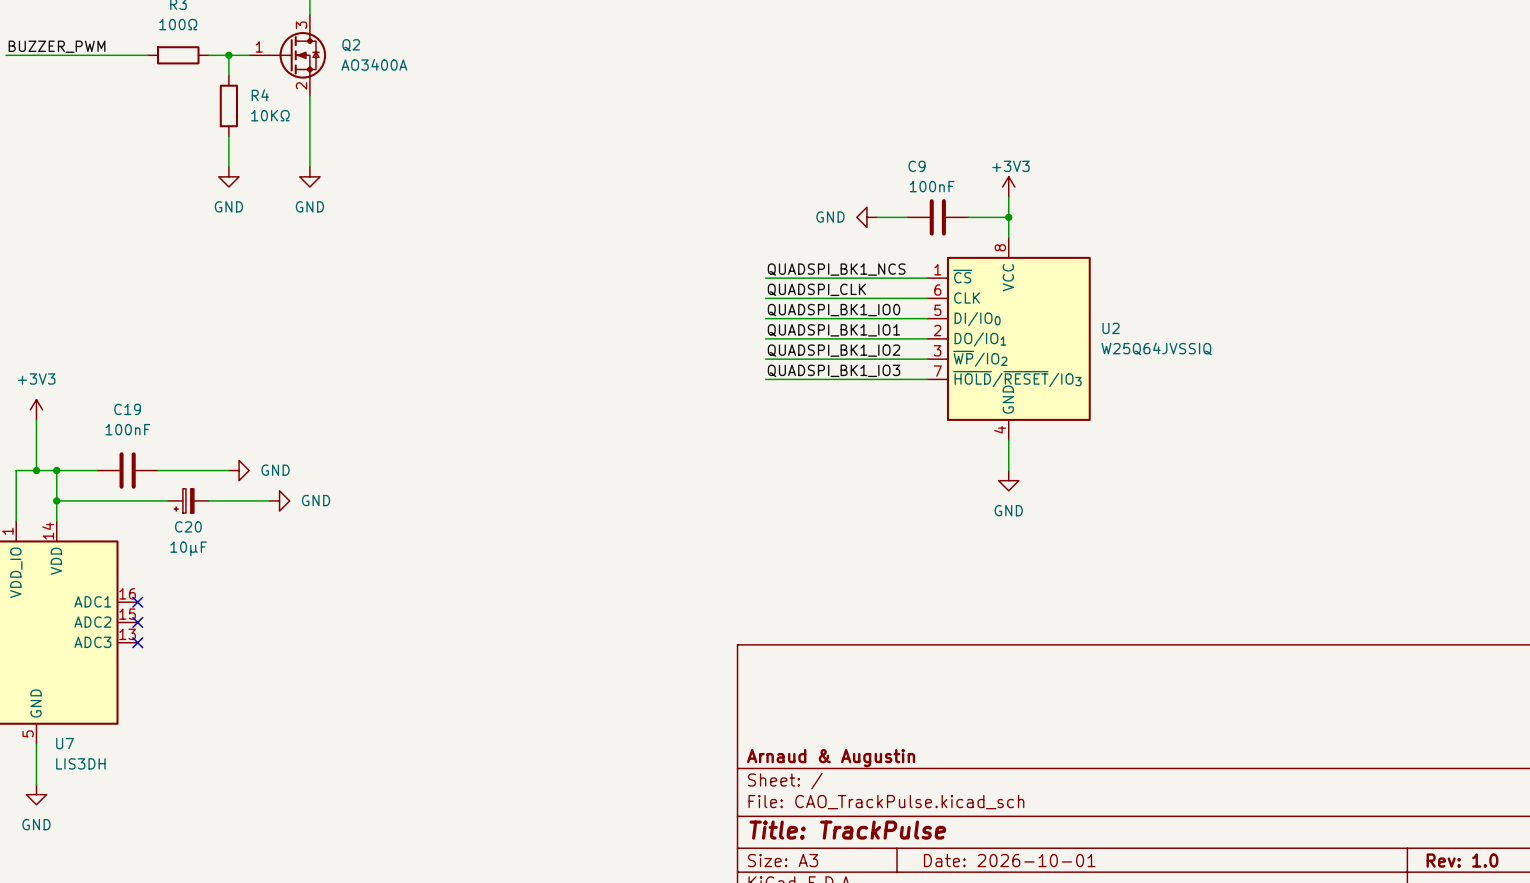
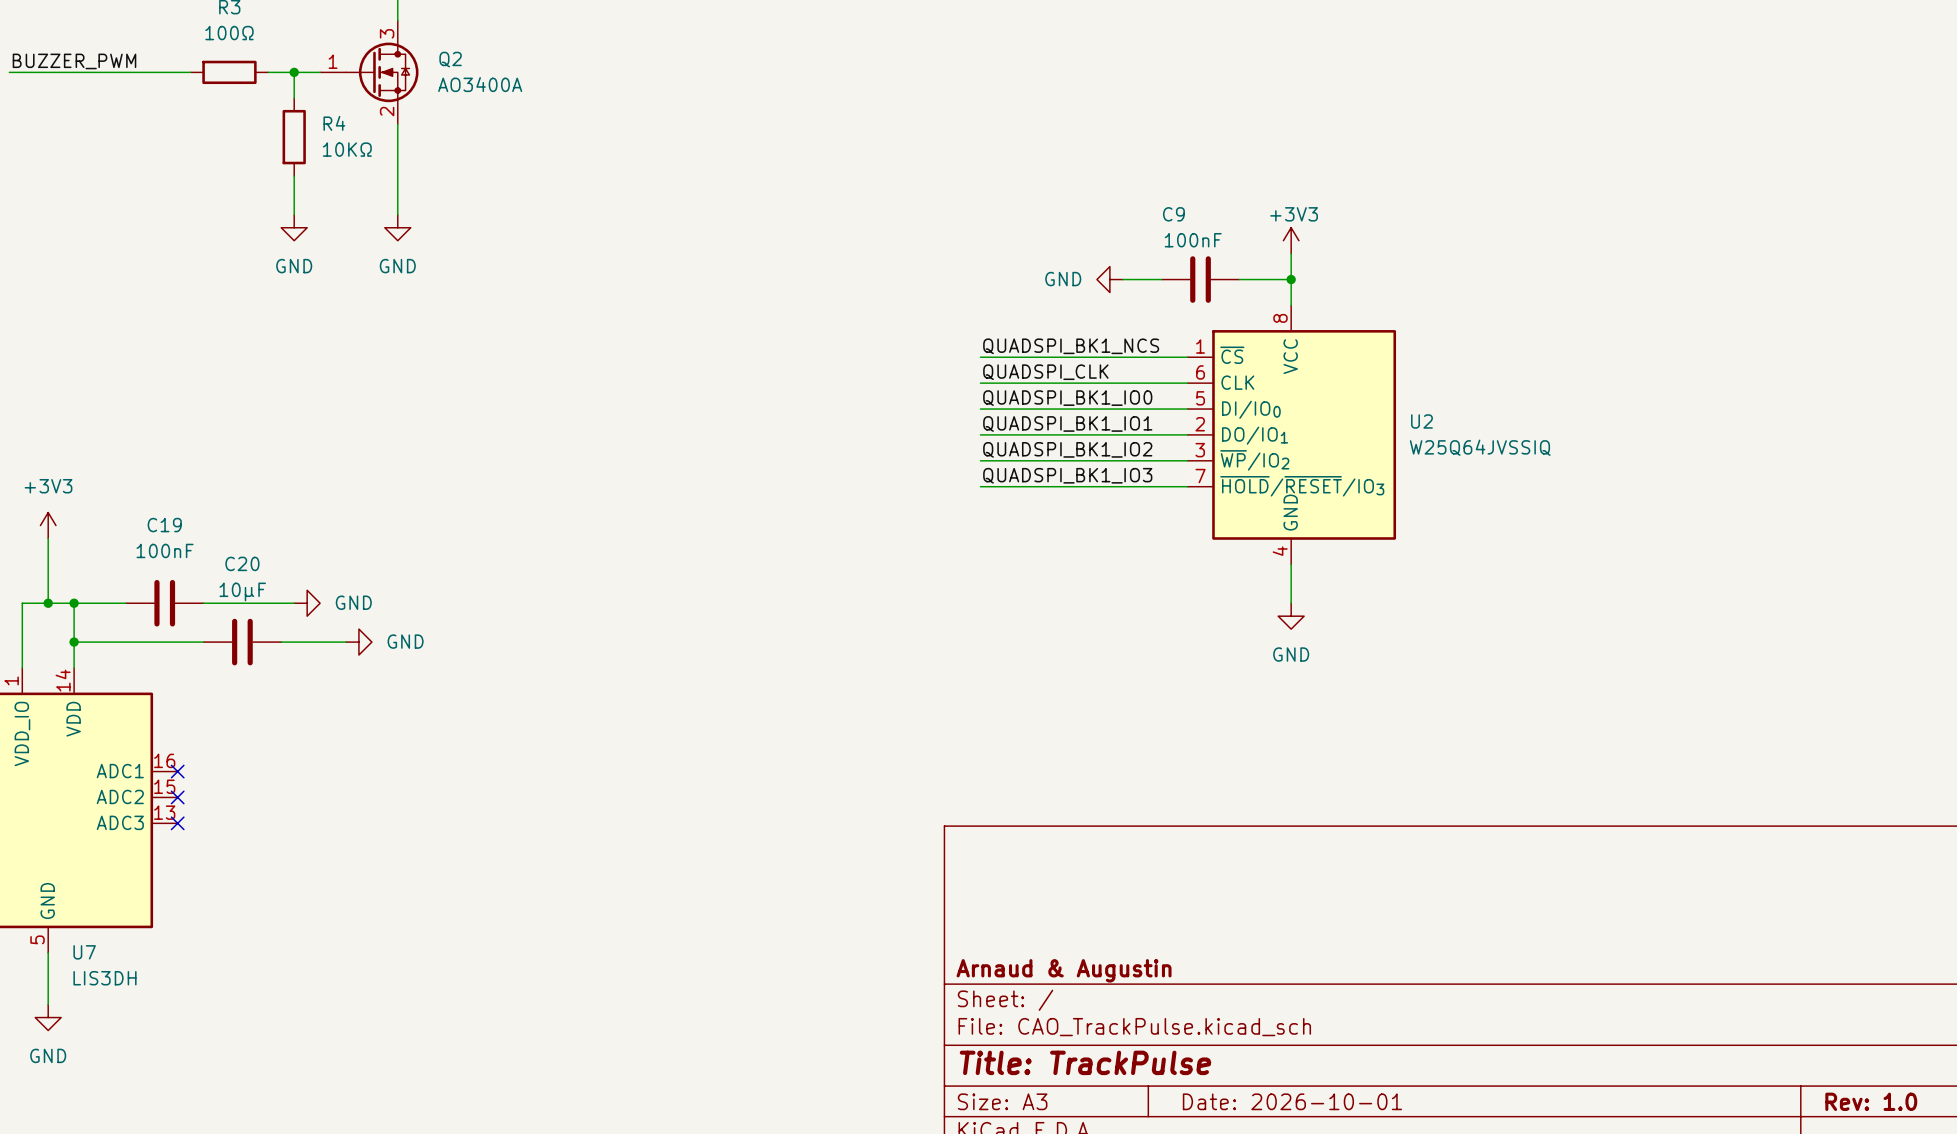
C20 symbol: [168, 488, 209, 514] -> [203, 618, 282, 666]
C20 name position: C20 (188, 526) -> C20 (242, 563)
C20 value position: 10µF (188, 548) -> 10µF (242, 591)

